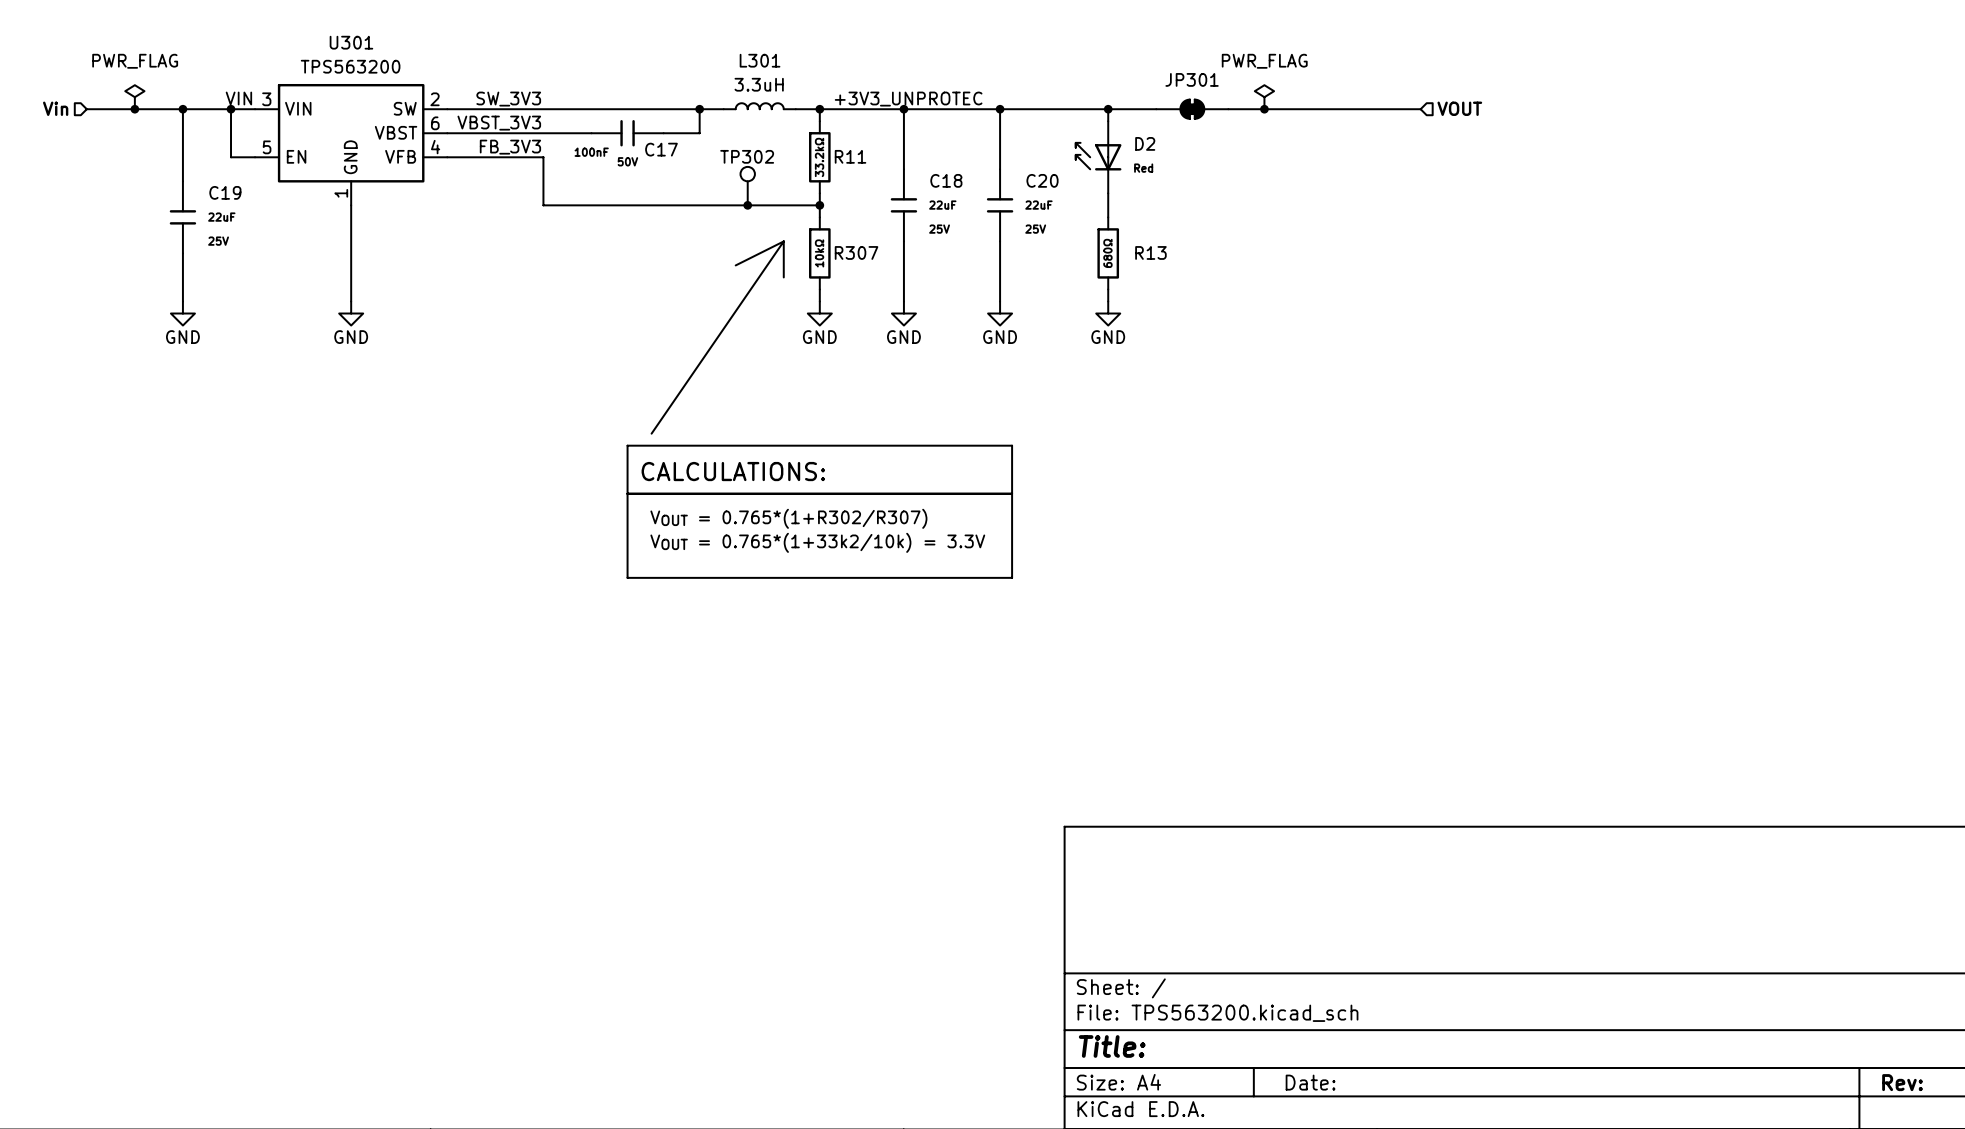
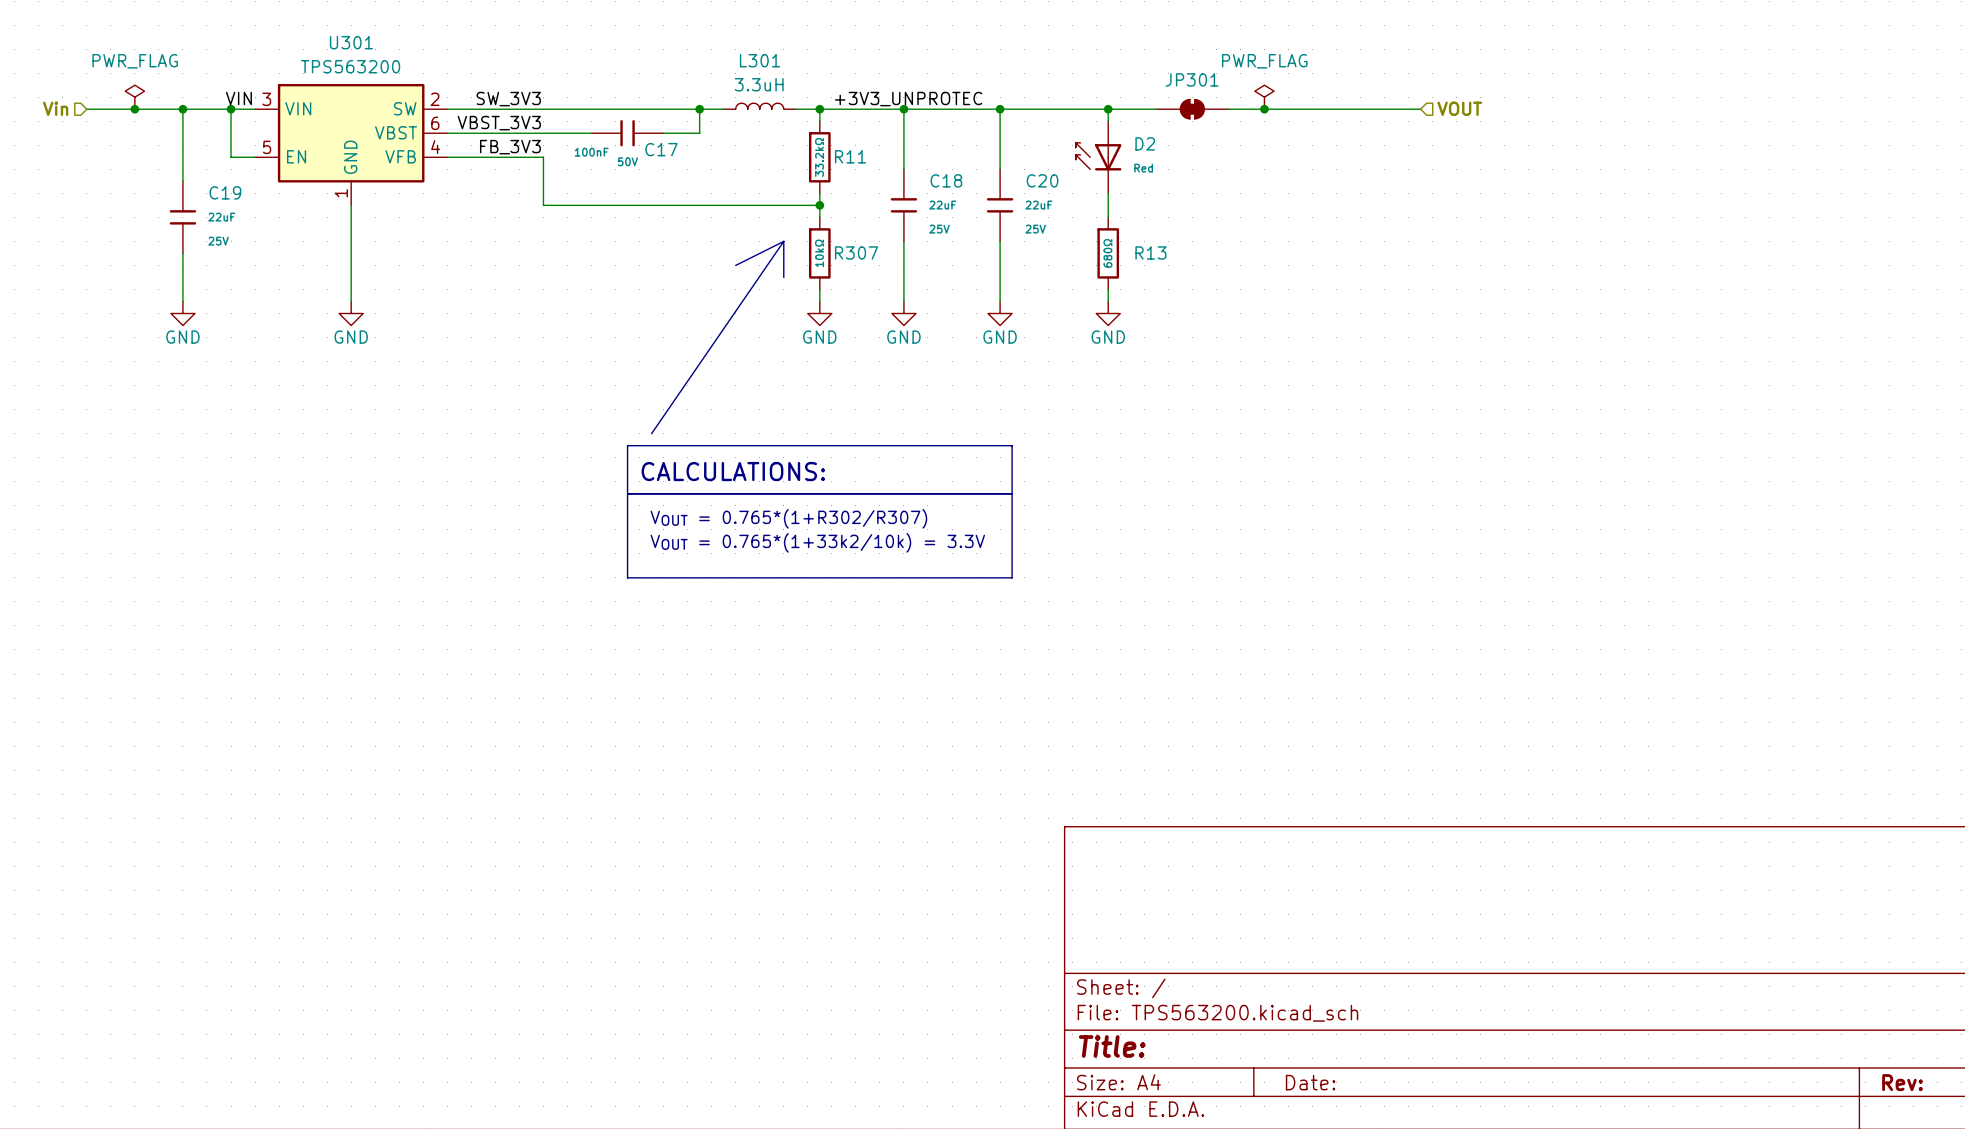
TP302: (747, 186) -> none
junction: (747, 205) -> none

